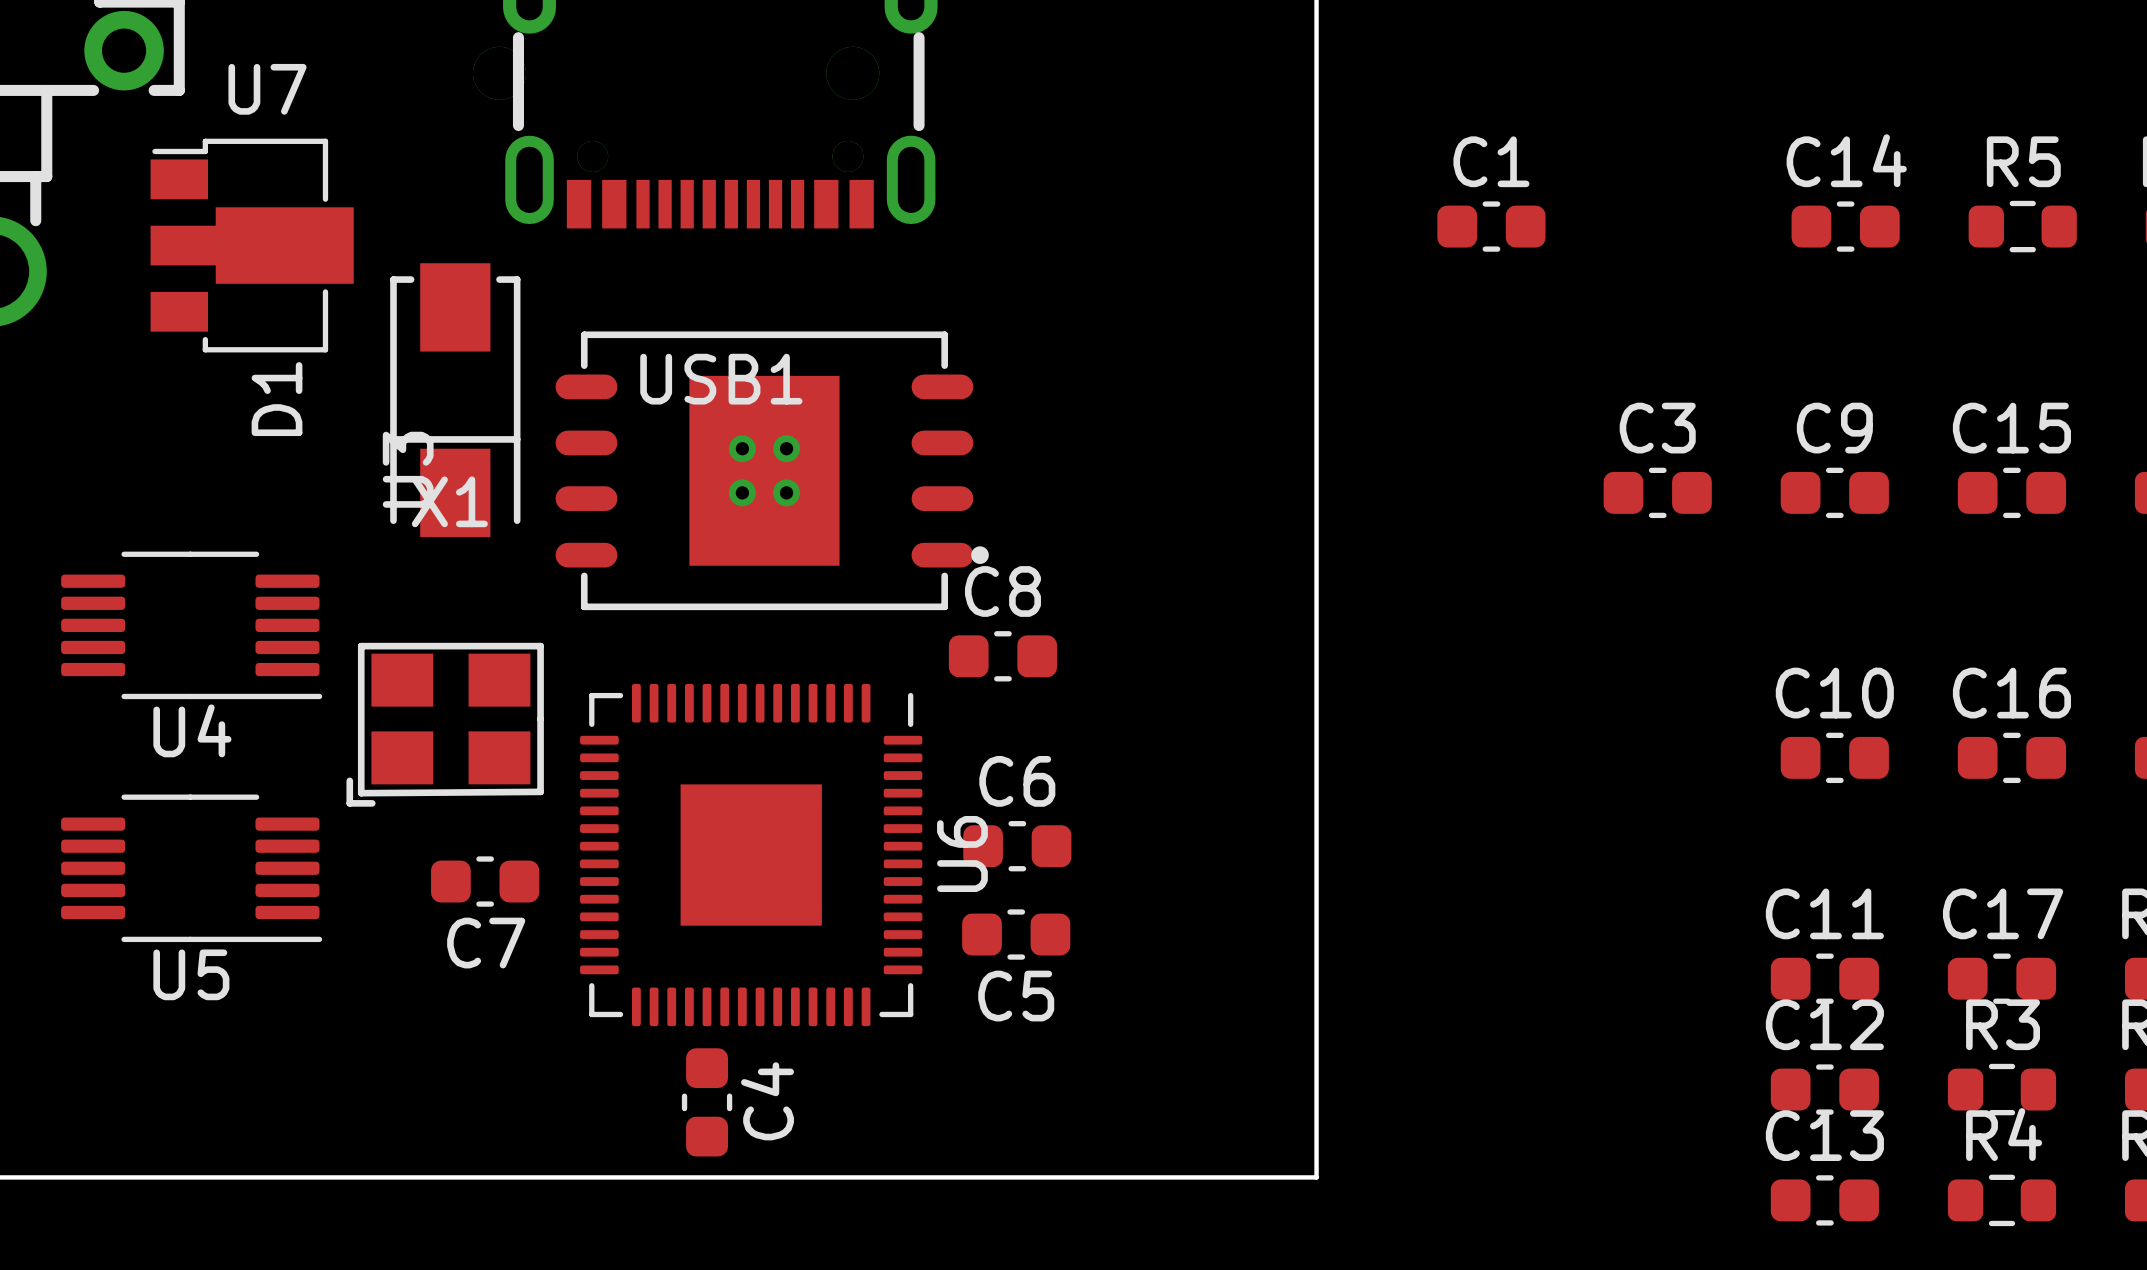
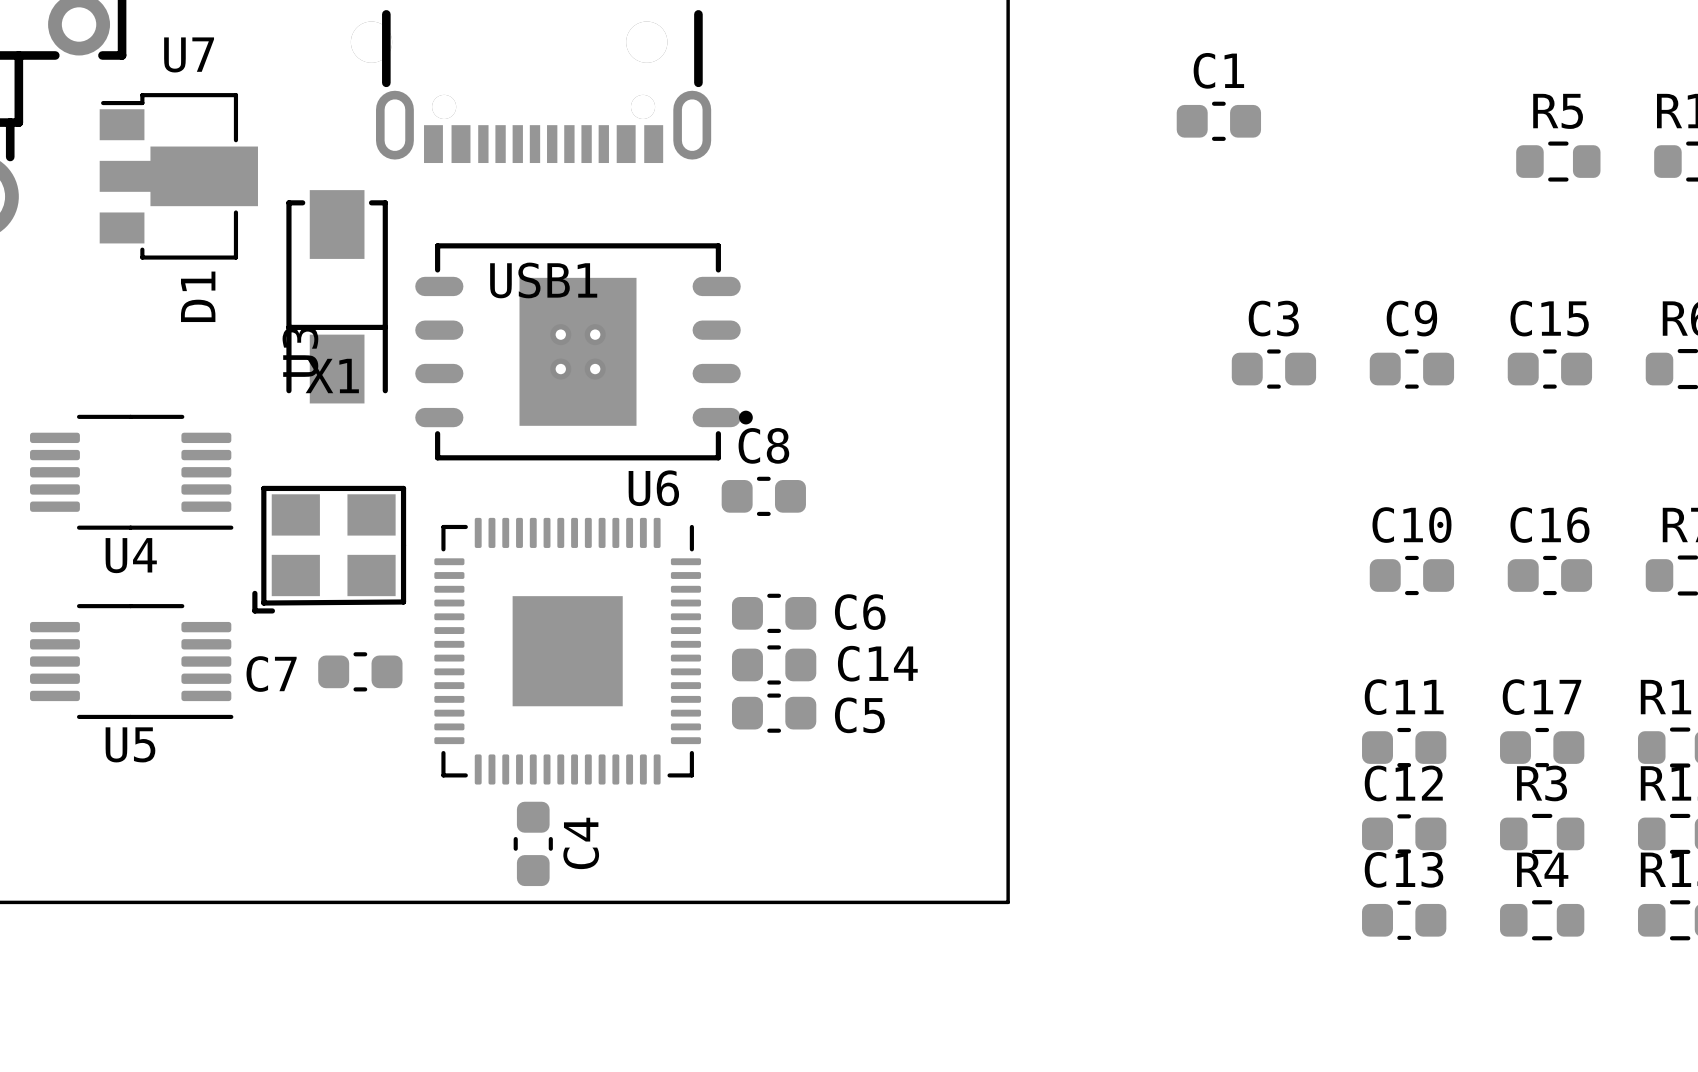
C14 name position: C14 (1846, 160) -> C14 (877, 663)
C1 position: (1491, 226) -> (1218, 121)
C14 position: (1845, 226) -> (774, 664)
C6 name position: C6 (1017, 781) -> C6 (860, 612)
C6 position: (1017, 846) -> (774, 613)
U6 name rotation: 0° (962, 853) -> 90° clockwise (653, 488)
U6 name position: U6 (962, 853) -> U6 (653, 488)
C7 name position: C7 (486, 943) -> C7 (271, 674)
C5 name position: C5 (1016, 996) -> C5 (859, 715)

